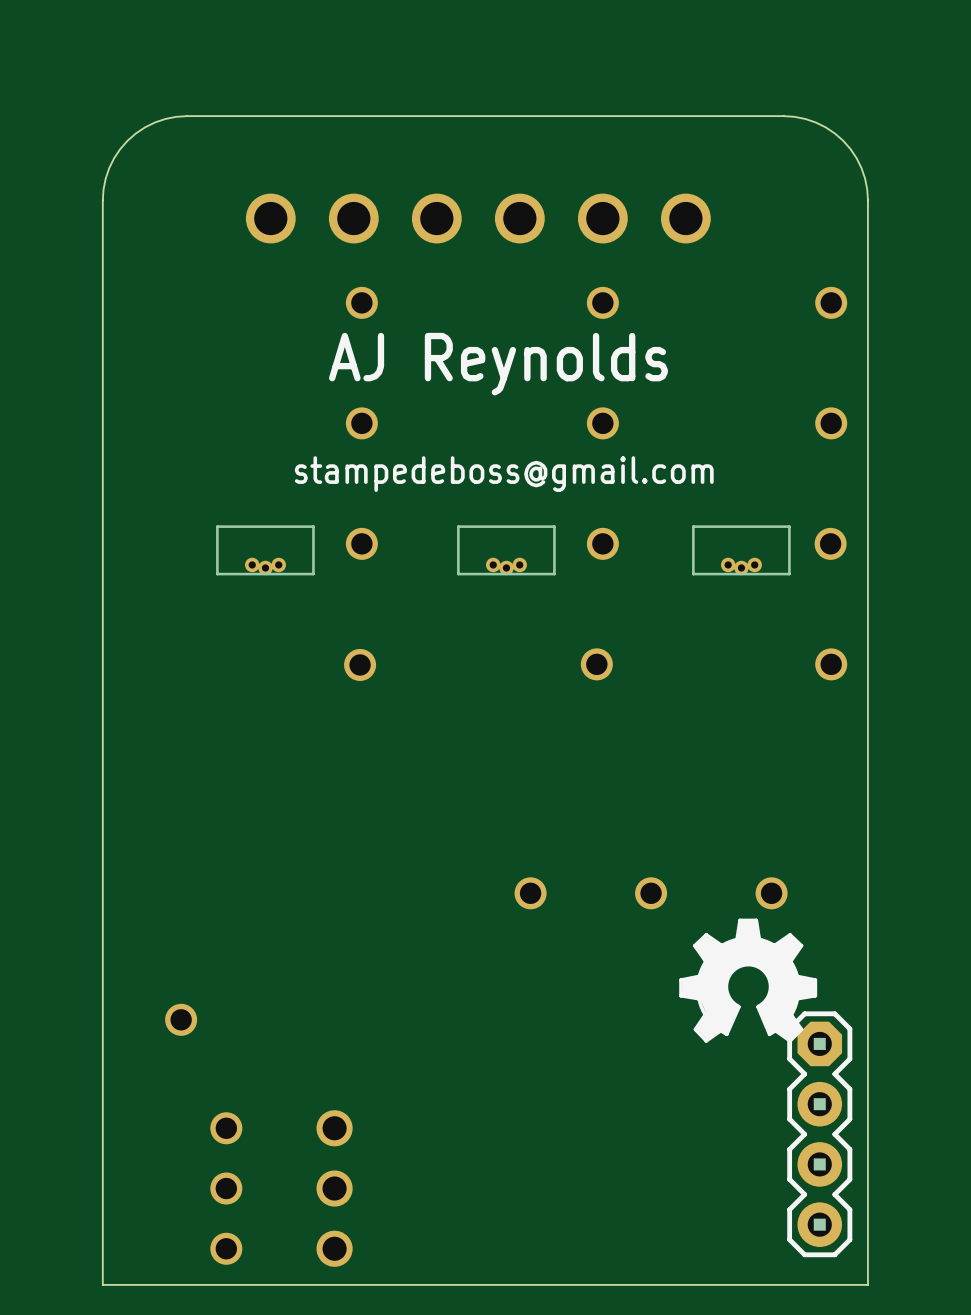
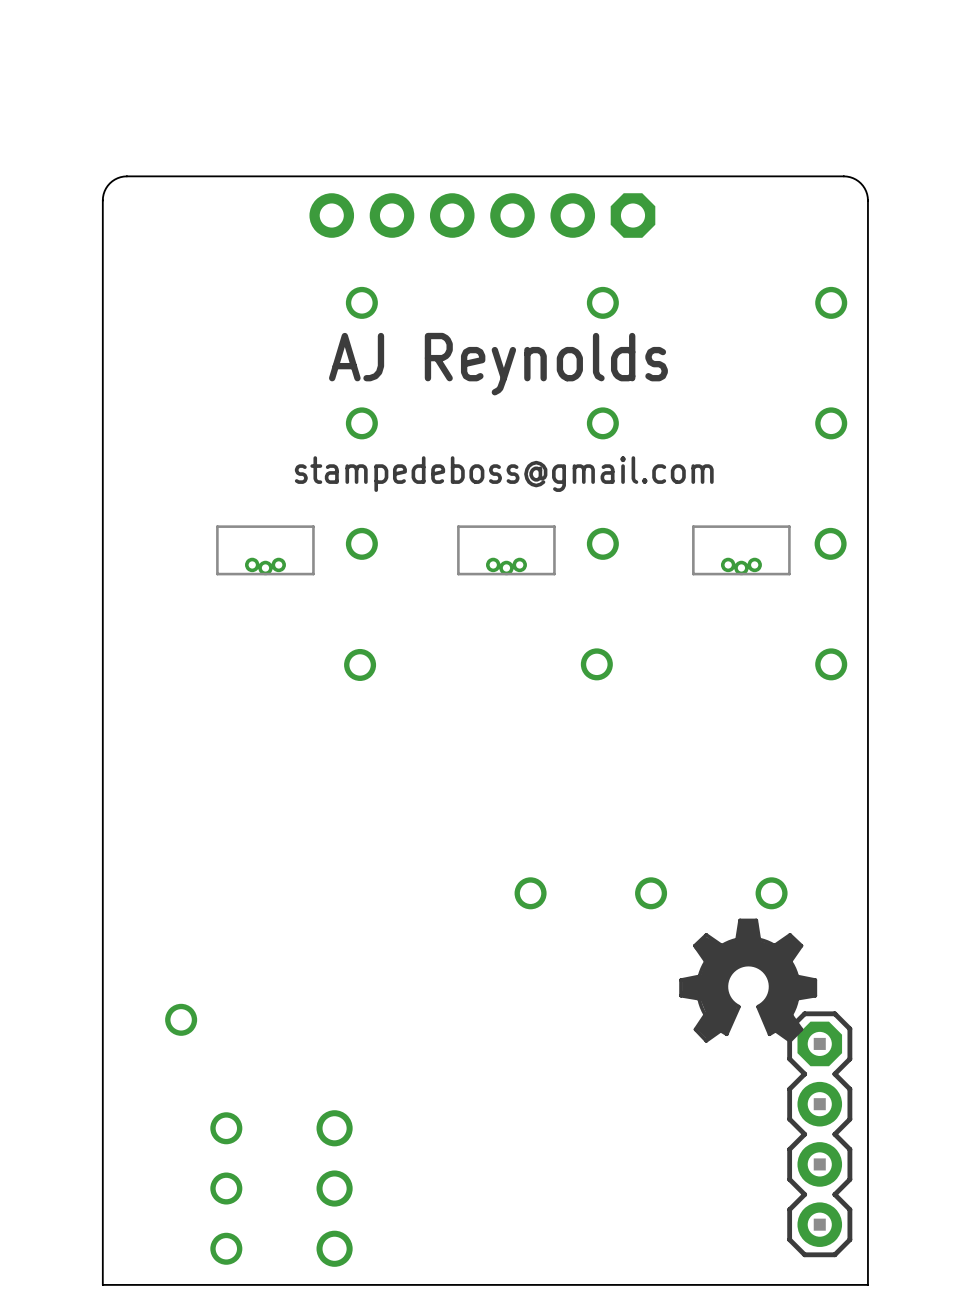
part footprint: [245, 193, 711, 244] -> [309, 193, 656, 238]
board edge: (867, 200) (861, 168) (843, 140) (815, 122) (783, 116) (176, 116) (144, 127) (120, 149) (105, 178) (102, 200) -> (867, 200) (866, 191) (860, 183) (853, 178) (843, 176) (126, 176) (117, 178) (109, 183) (104, 191) (102, 200)

